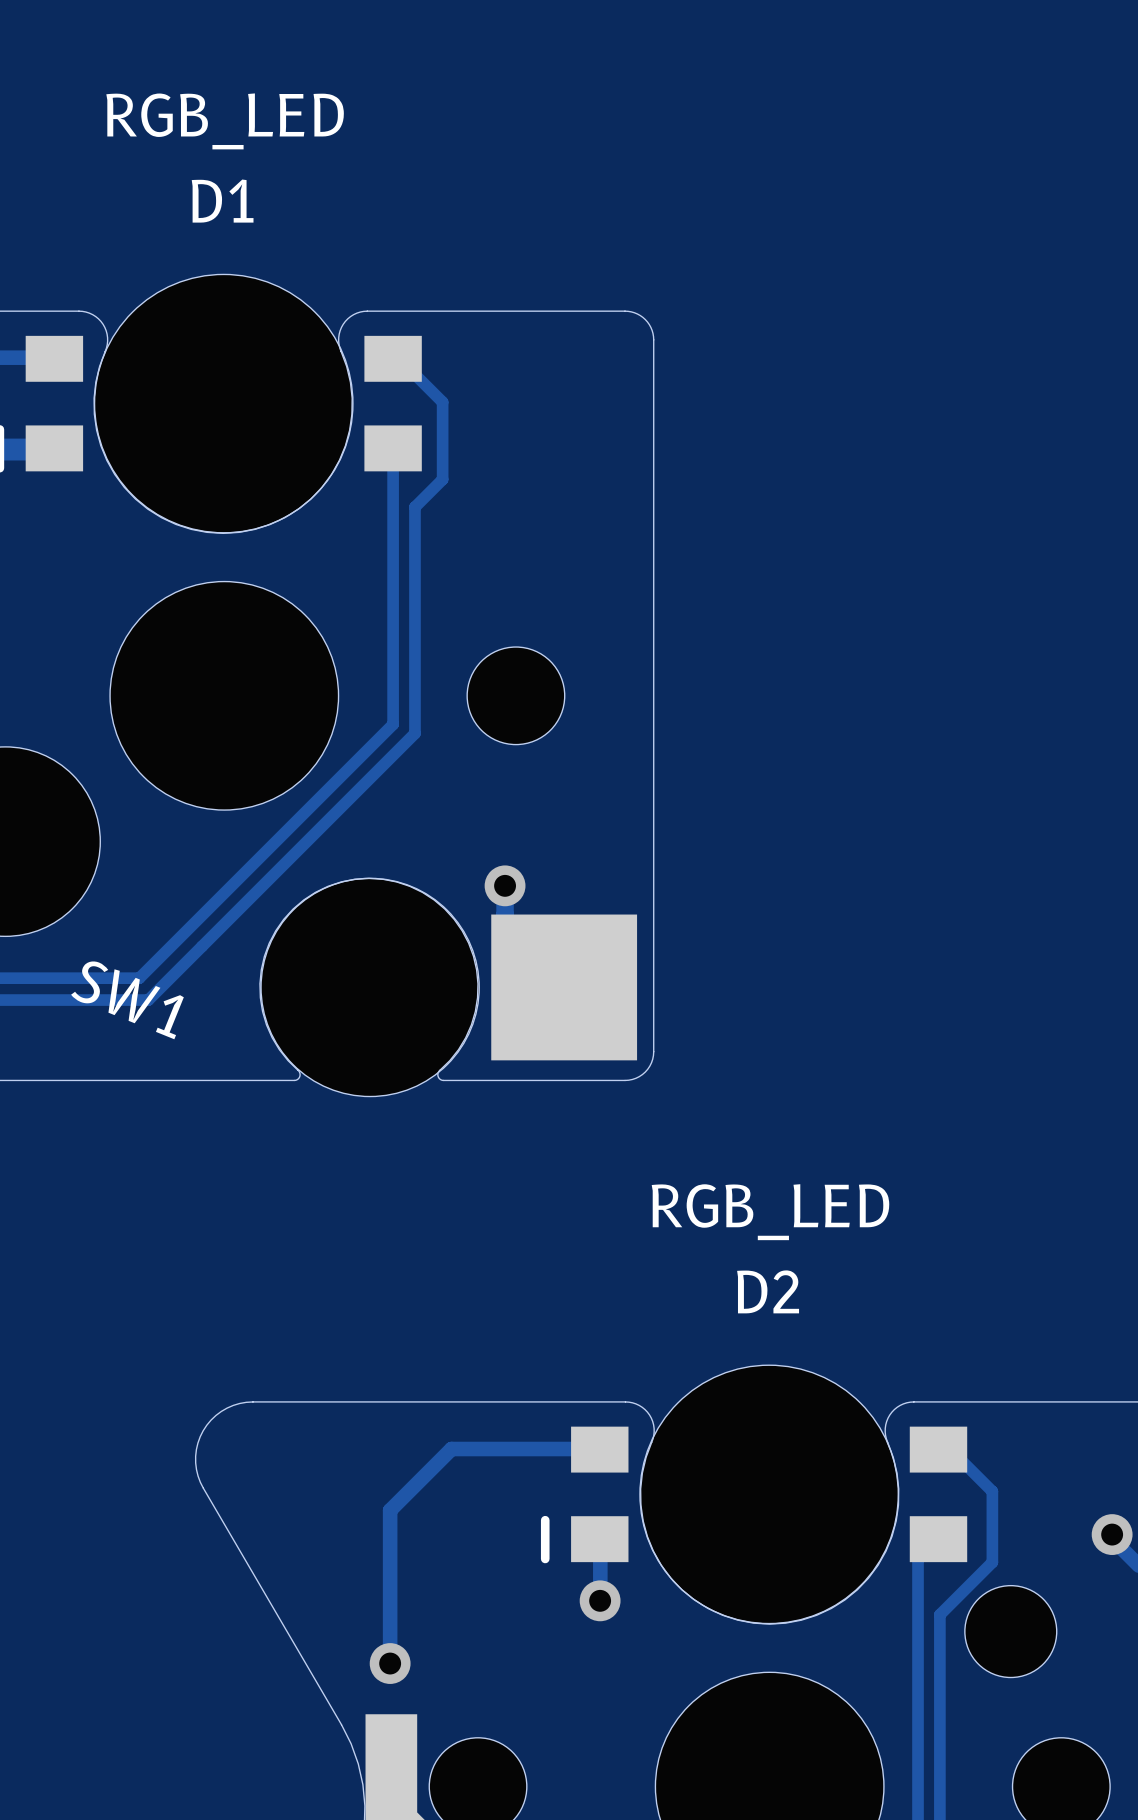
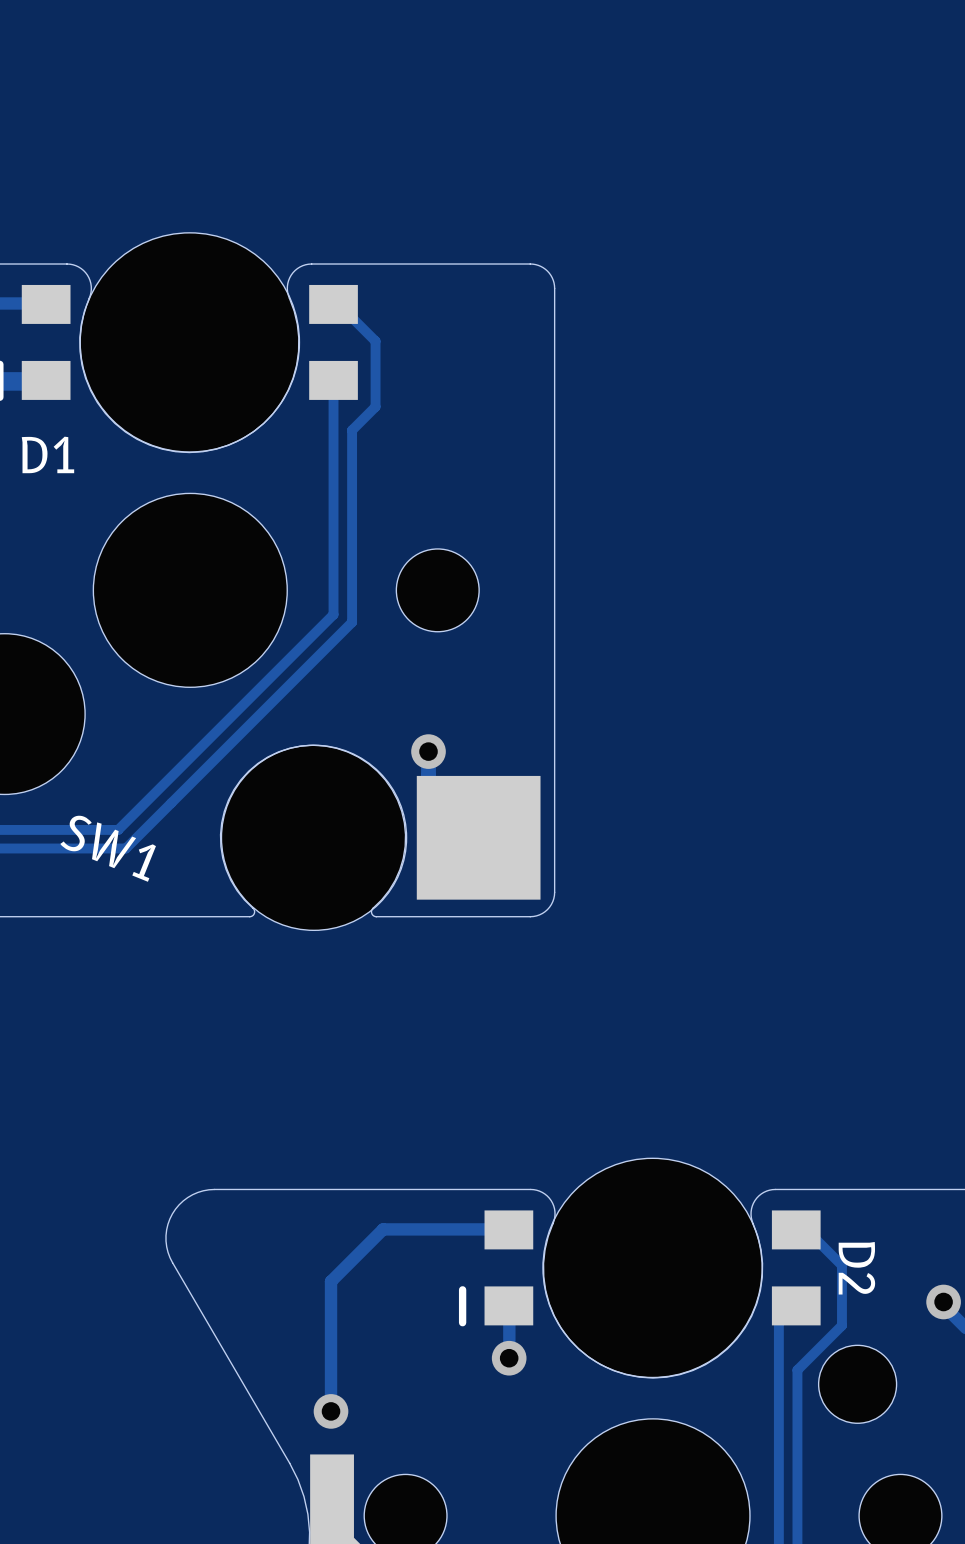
D1 value: RGB_LED (225, 121) -> none
D1 name position: D1 (222, 201) -> D1 (47, 454)
D2 value: RGB_LED (770, 1212) -> none
D2 name rotation: 0° (768, 1291) -> 90° clockwise (856, 1268)
D2 name position: D2 (768, 1291) -> D2 (856, 1268)

